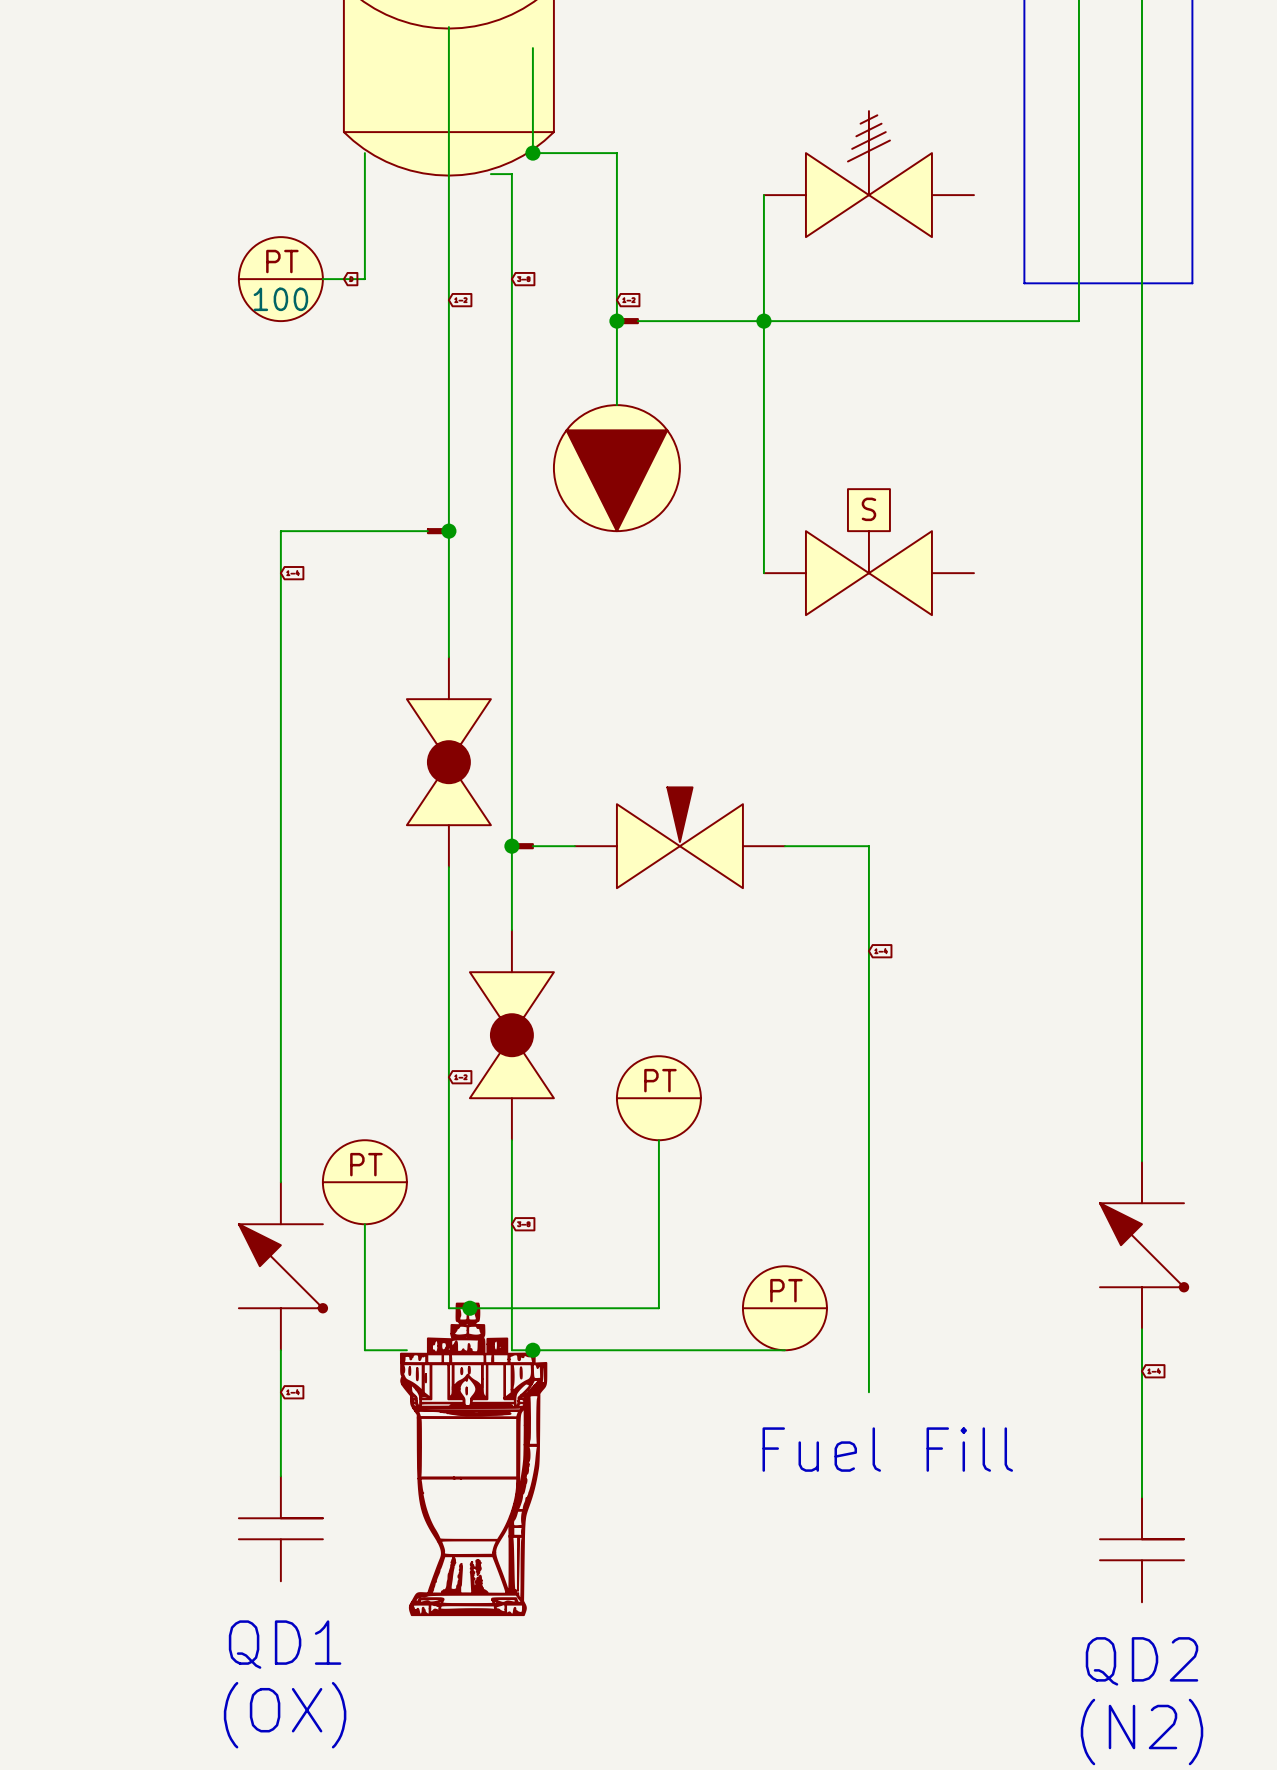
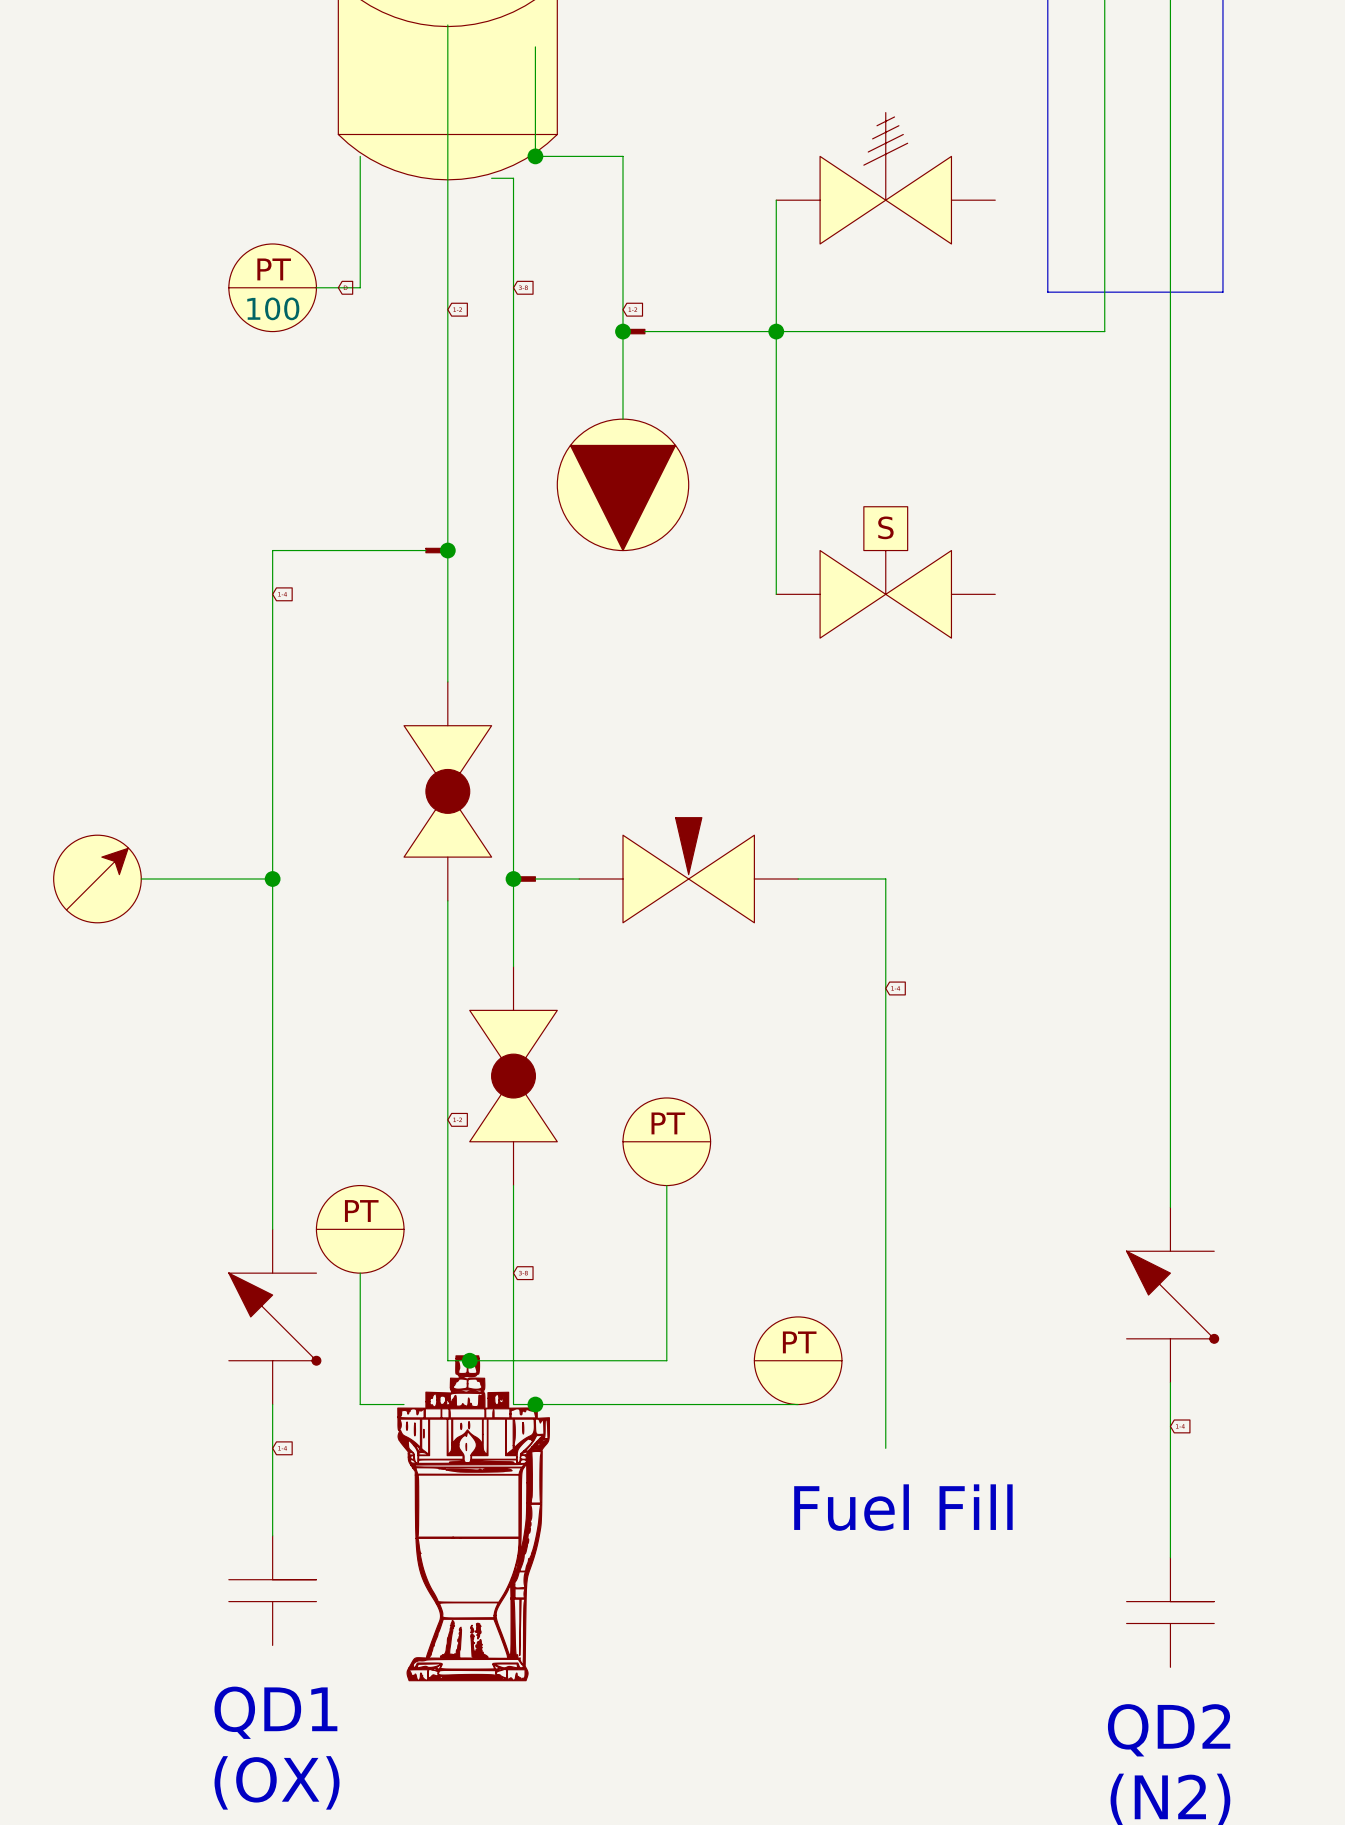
part: none -> (97, 879)
wire: none -> (141, 879) (272, 879)
junction: none -> (272, 879)

